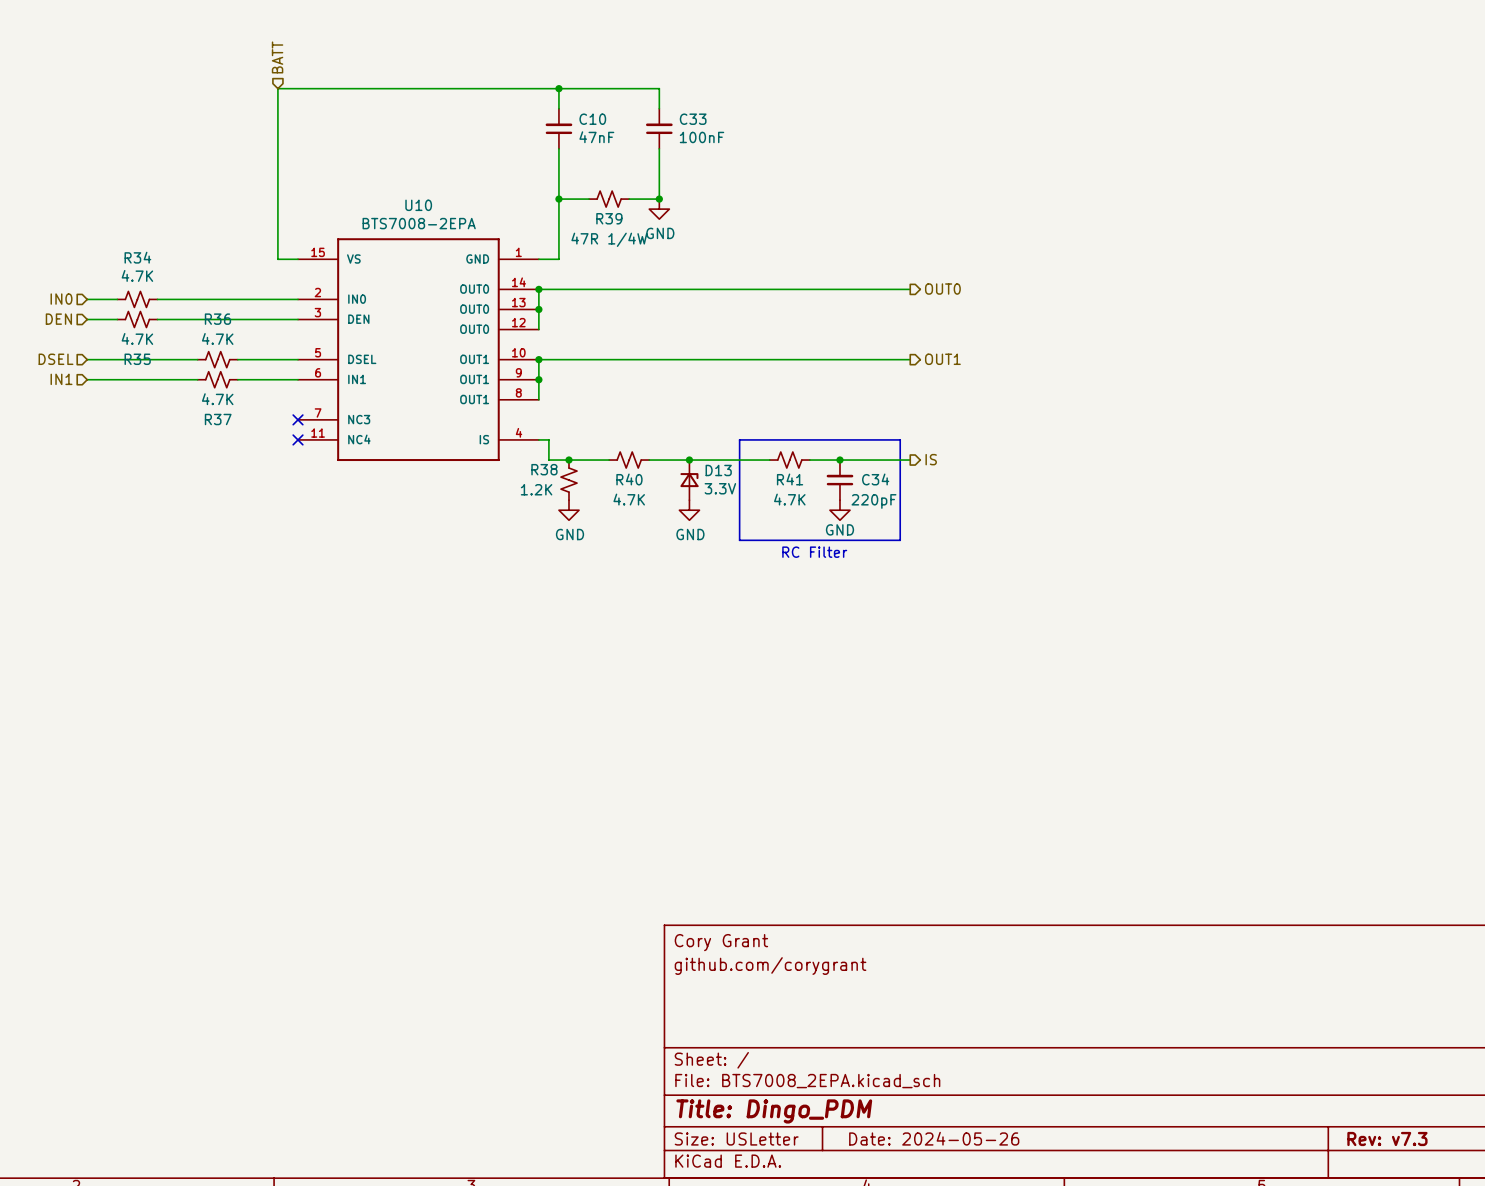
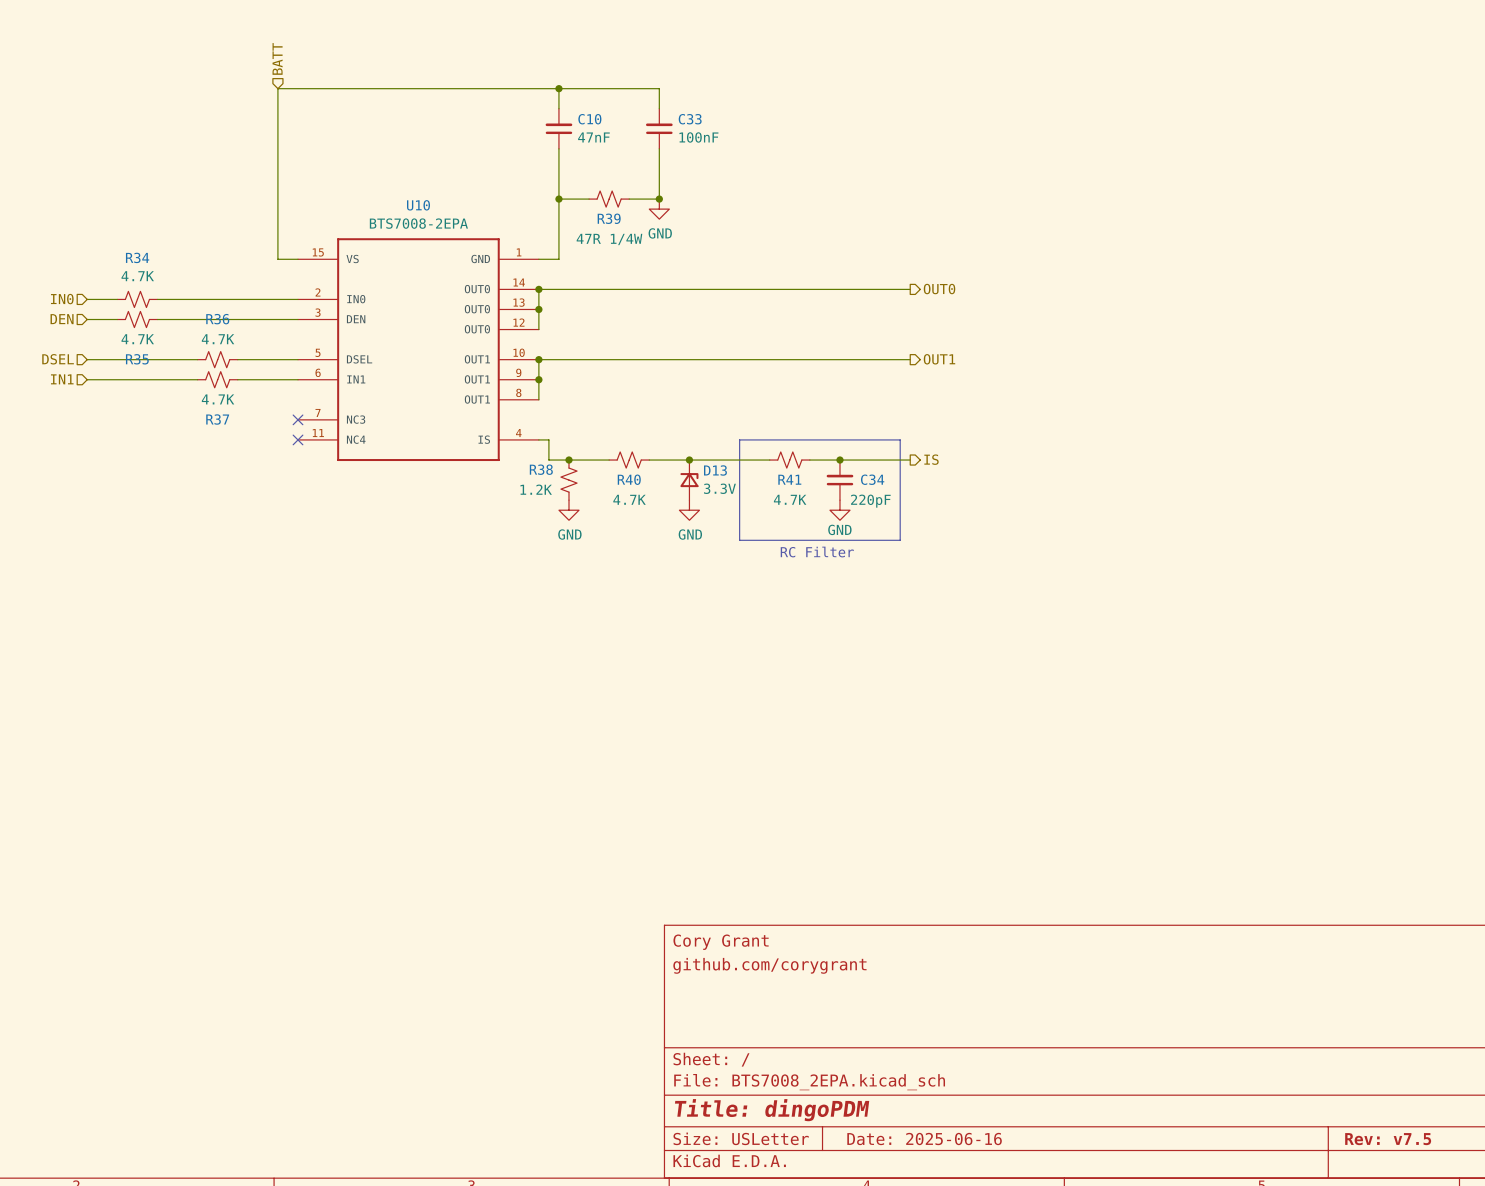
title block: Title: Dingo_PDM (774, 1111) -> Title: dingoPDM (772, 1110)
title block: Date: 2024-05-26 (934, 1138) -> Date: 2025-06-16 (924, 1139)
title block: Rev: v7.3 (1387, 1138) -> Rev: v7.5 (1388, 1139)

